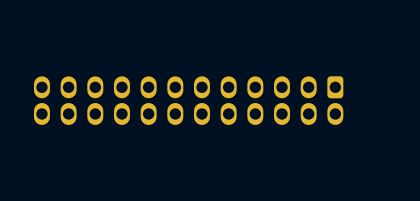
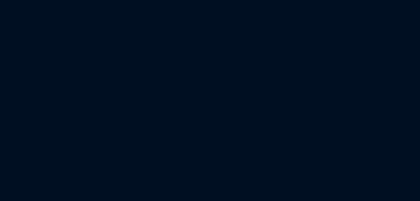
part: (188, 100) -> none

